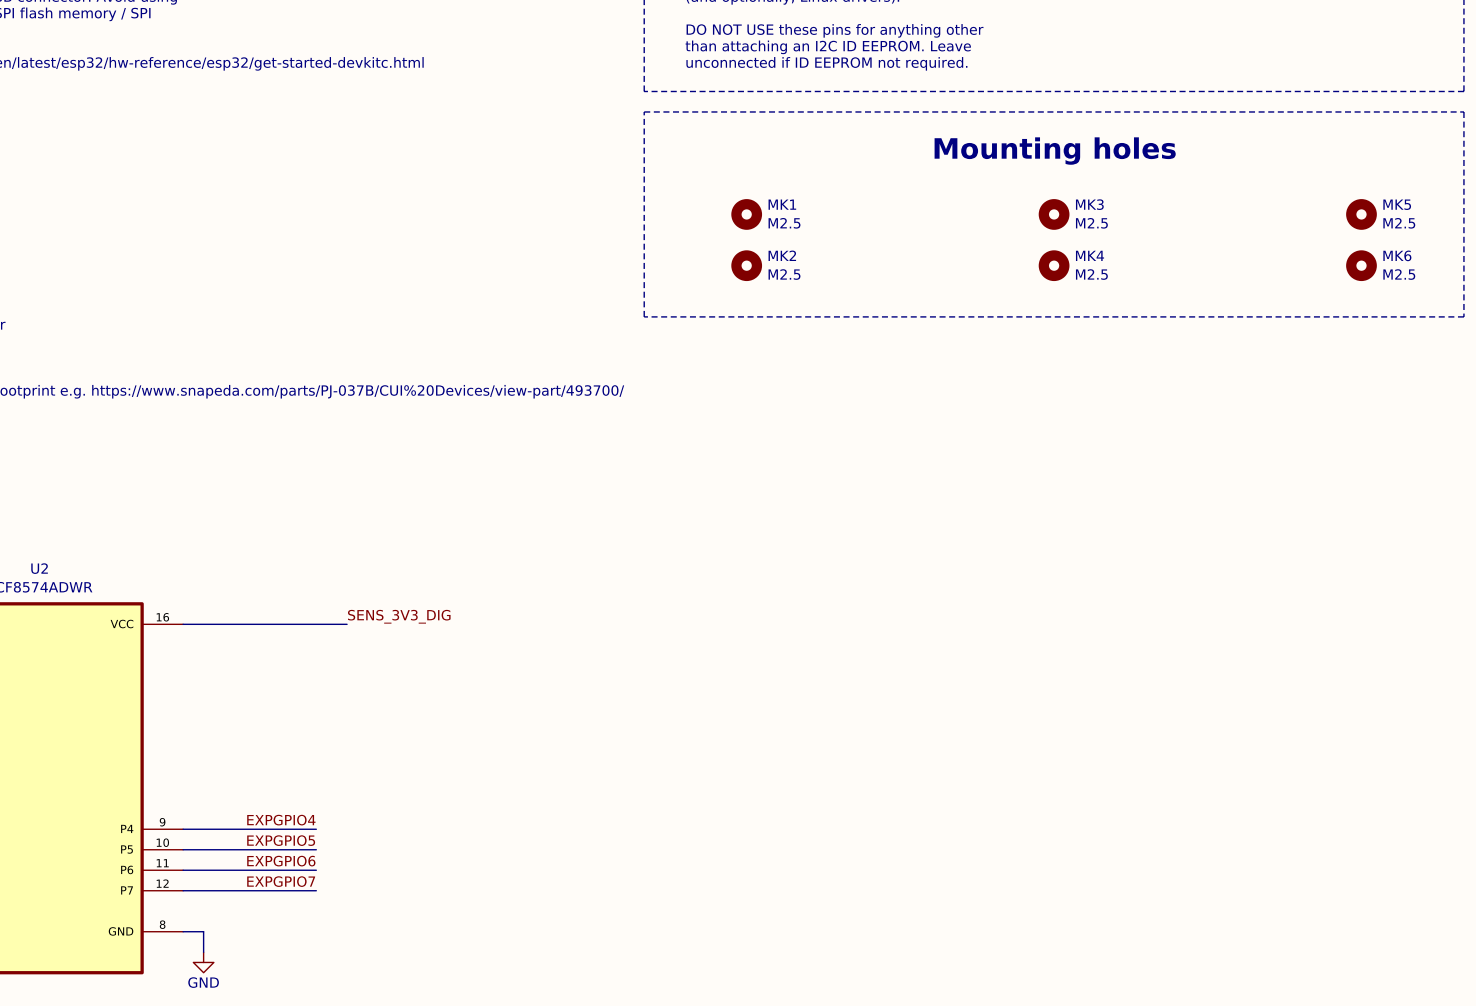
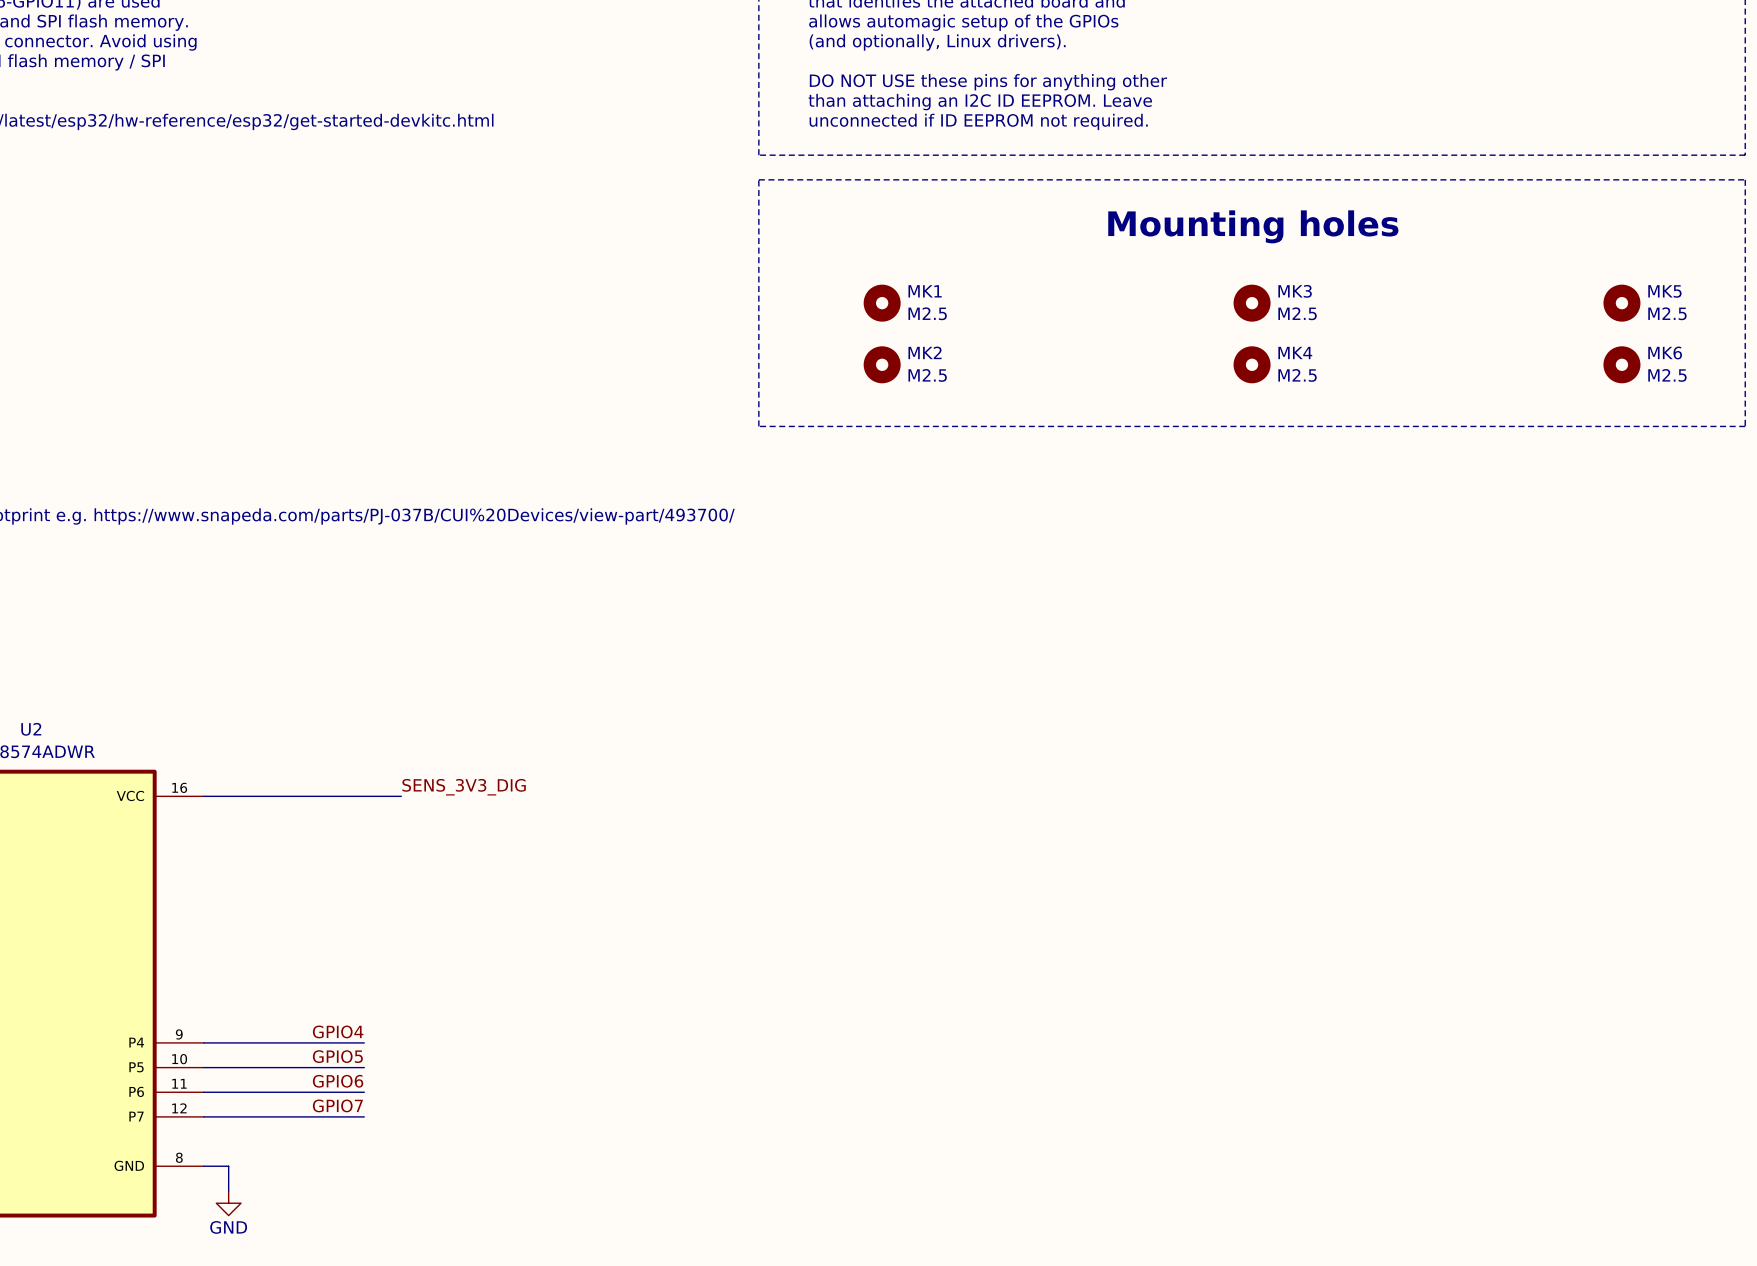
label: EXPGPIO4 (281, 820) -> GPIO4 (338, 1031)
label: EXPGPIO5 (281, 840) -> GPIO5 (337, 1056)
label: EXPGPIO6 (281, 861) -> GPIO6 (338, 1081)
label: EXPGPIO7 (281, 881) -> GPIO7 (337, 1105)

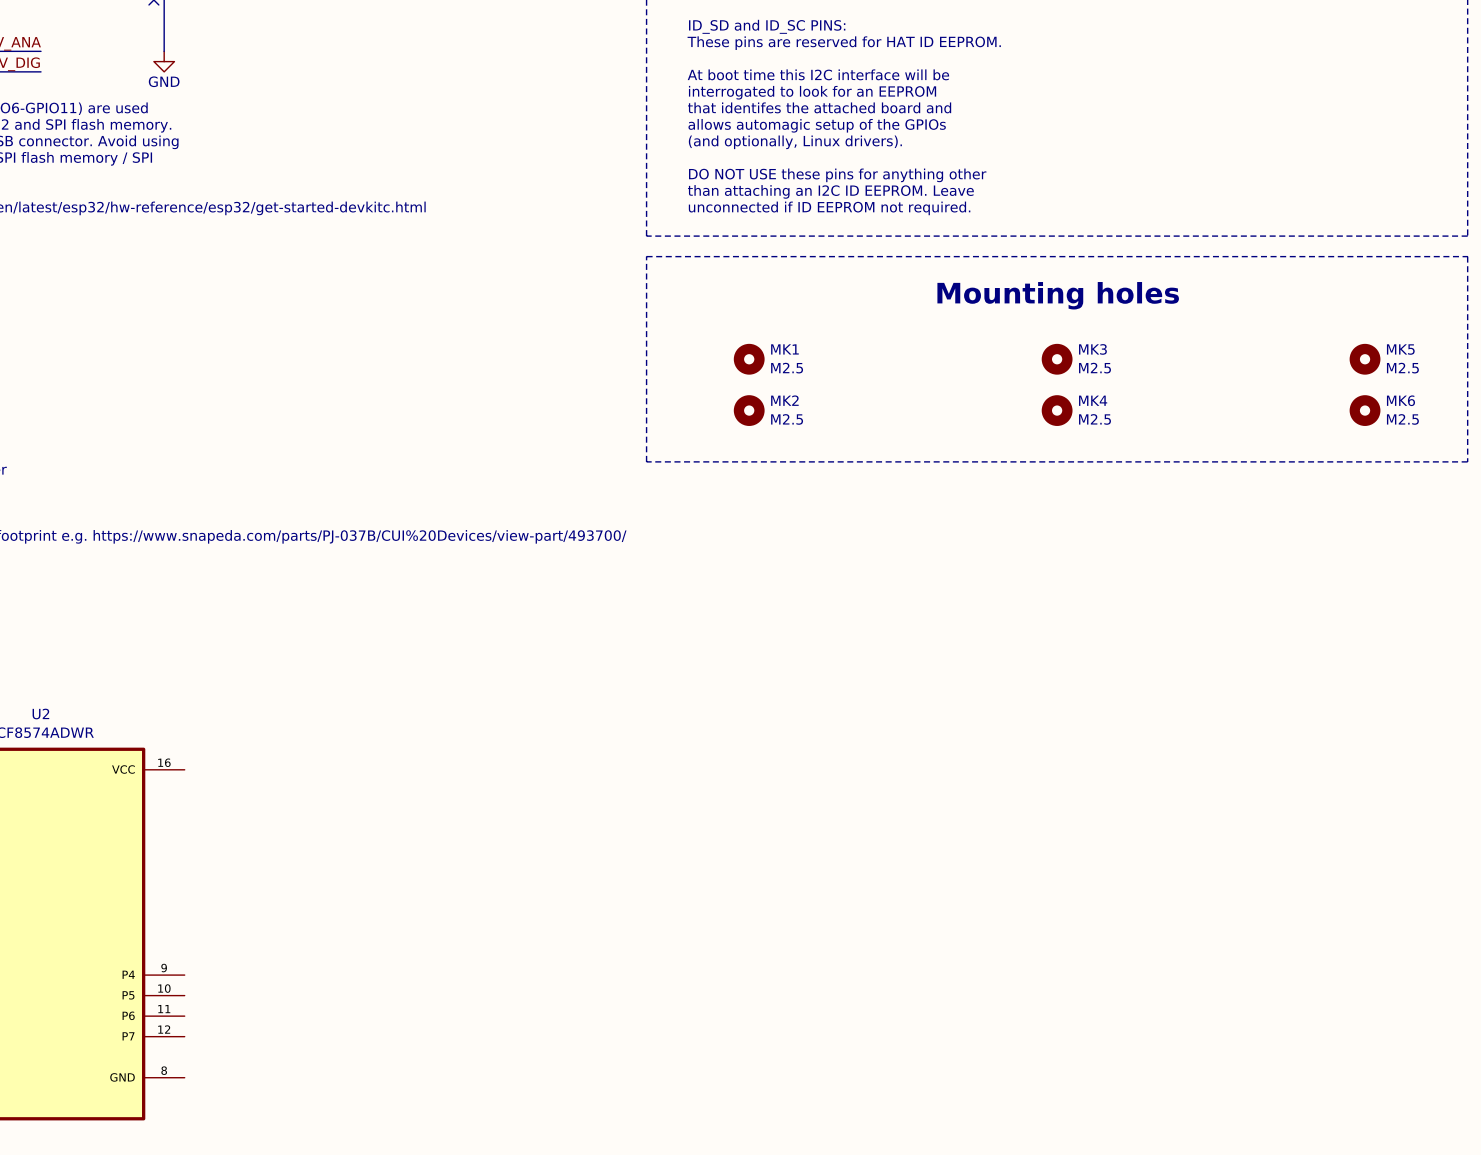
label: SENS_3V3_DIG (464, 787) -> none
wire: (204, 796) (401, 796) -> none
label: GPIO4 (338, 1031) -> none
wire: (204, 1042) (364, 1042) -> none
label: GPIO5 (337, 1056) -> none
wire: (204, 1067) (364, 1067) -> none
label: GPIO6 (338, 1081) -> none
wire: (204, 1092) (364, 1092) -> none
label: GPIO7 (337, 1105) -> none
wire: (204, 1116) (364, 1116) -> none
wire: (204, 1166) (228, 1166) (228, 1190) -> none
power symbol: GND (228, 1203) -> none

